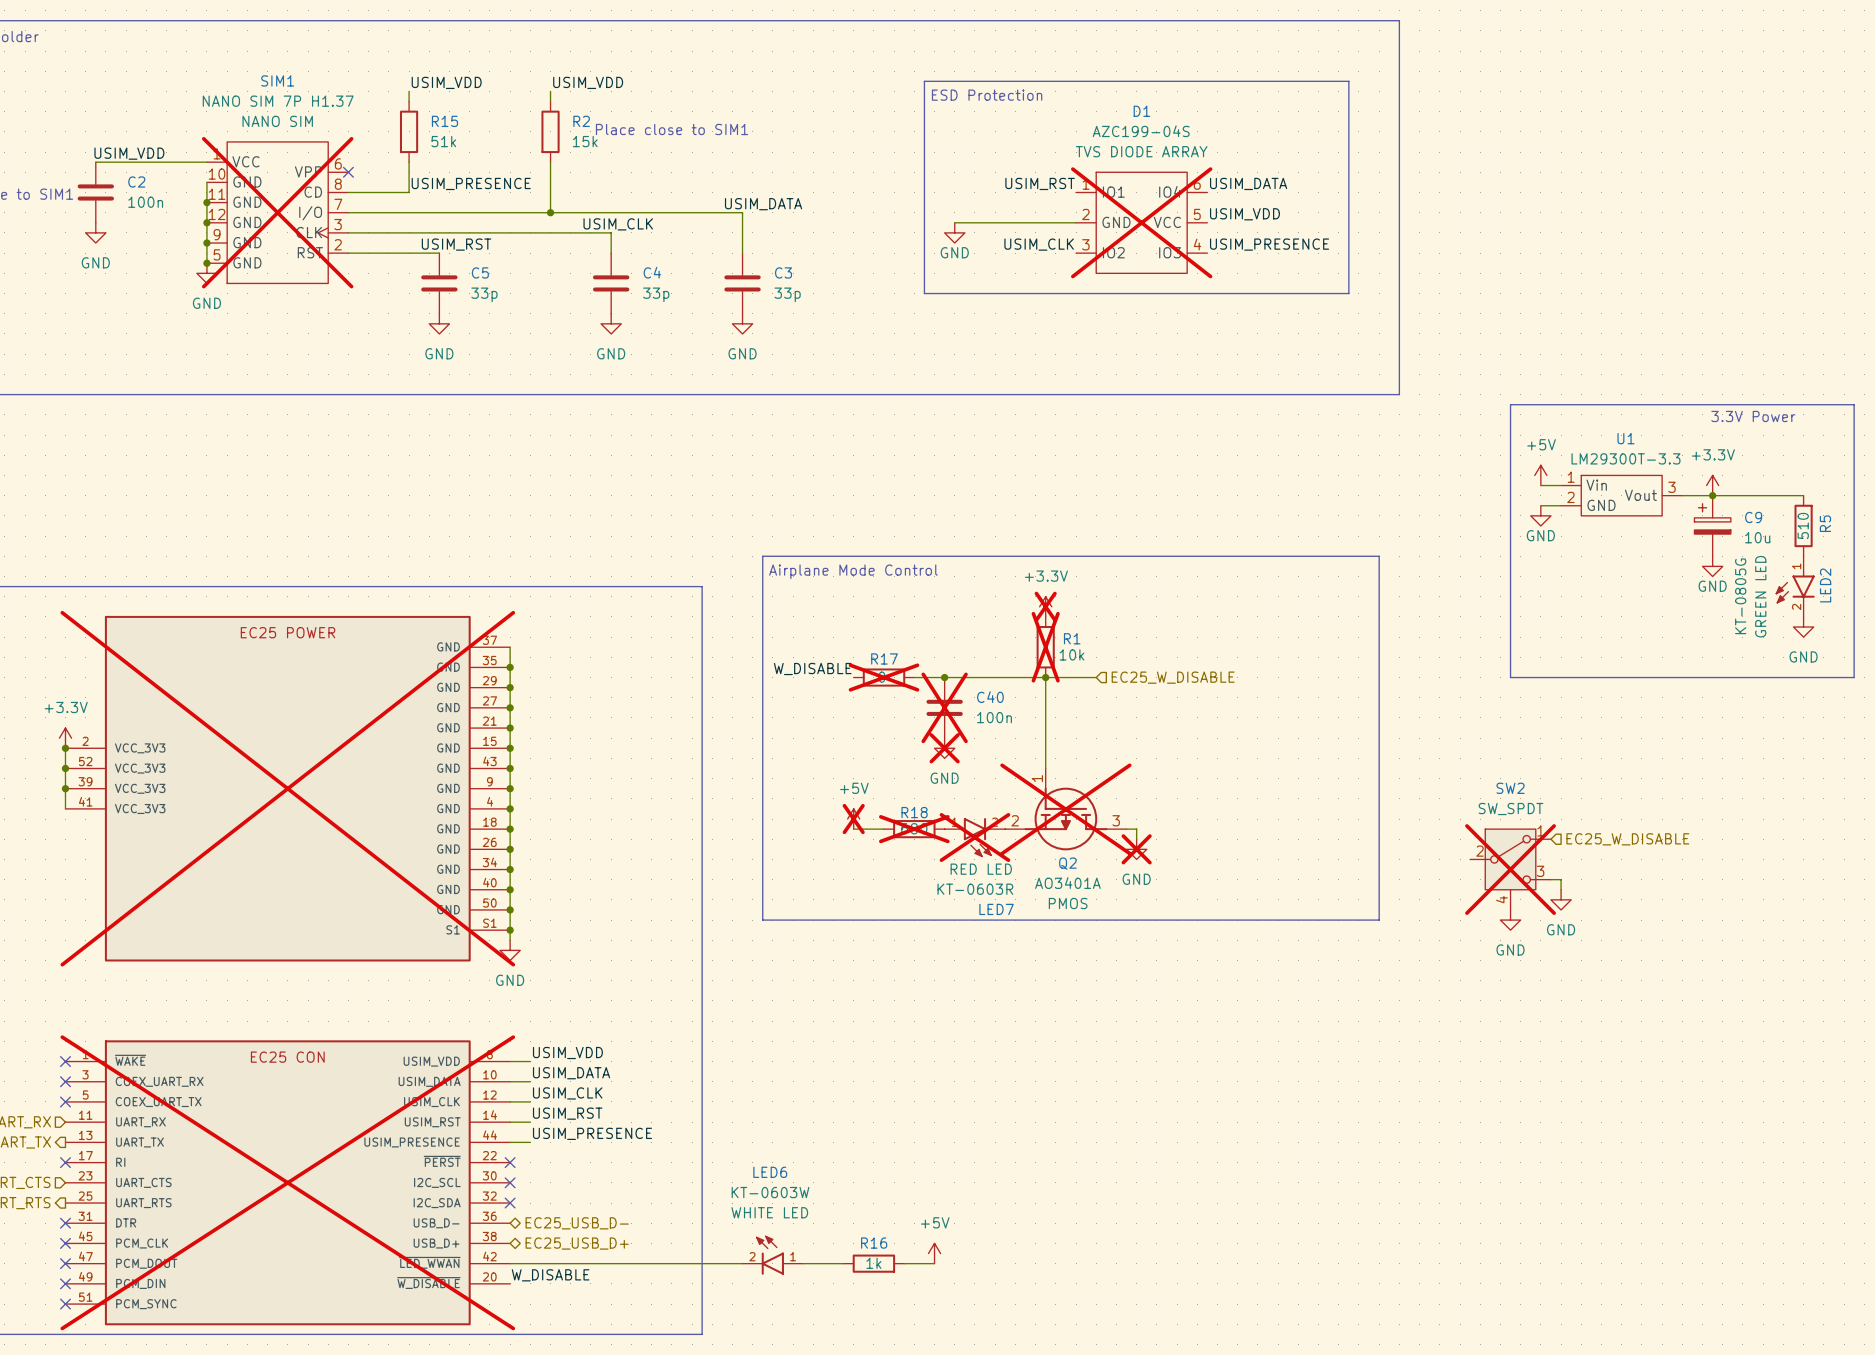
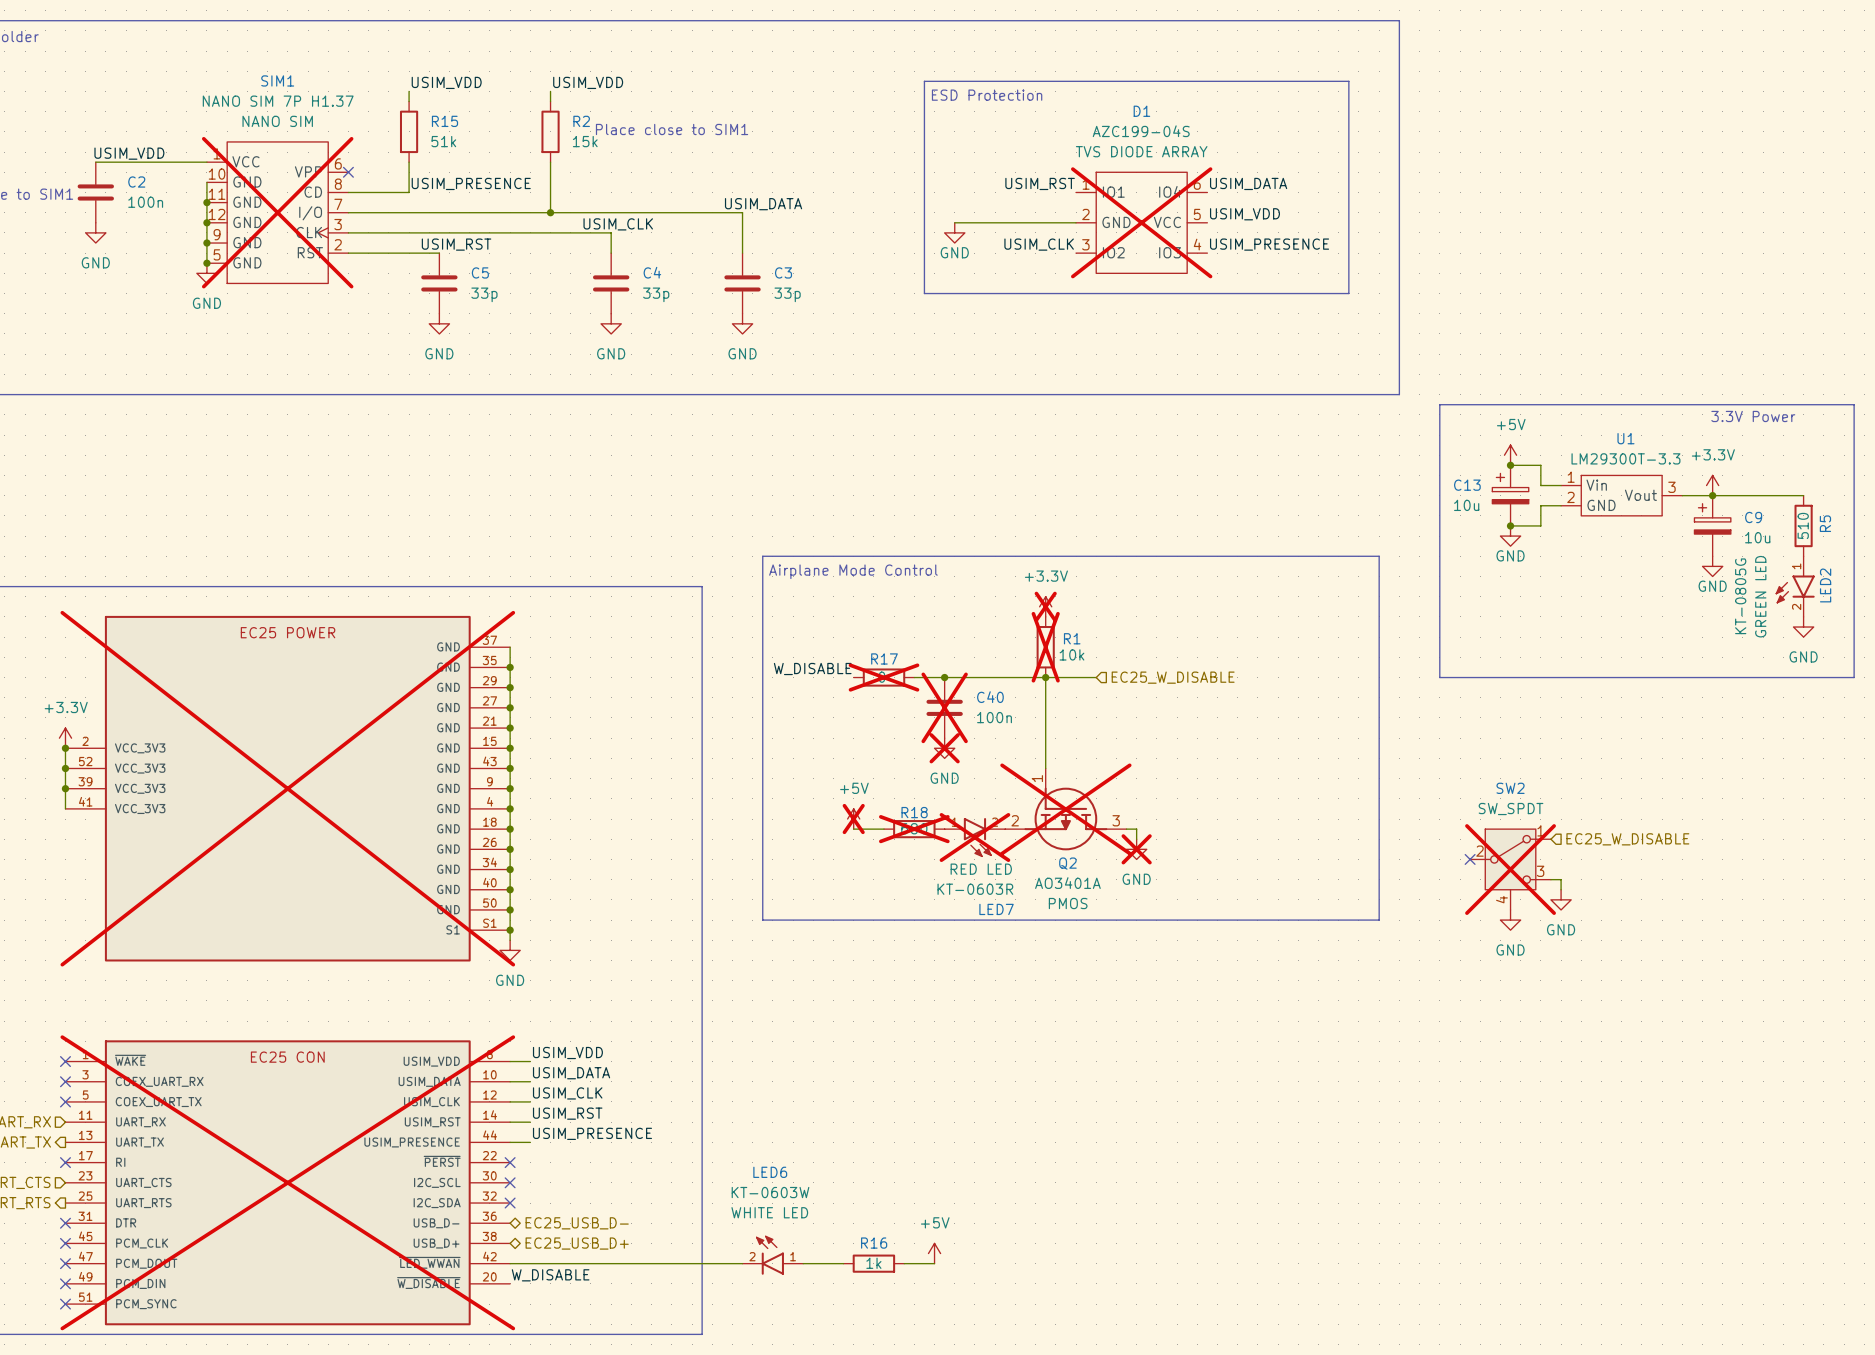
line: (1510, 404) (1510, 677) -> (1510, 404) (1439, 404) (1439, 677) (1510, 677)
wire: none -> (1510, 465) (1540, 465) (1540, 485)
junction: none -> (1510, 465)
power symbol position: +5V (1540, 475) -> +5V (1510, 455)
C13: none -> 10u (1510, 495)
wire: none -> (1540, 505) (1540, 525) (1510, 525)
power symbol position: GND (1540, 515) -> GND (1510, 536)
junction: none -> (1510, 525)
no-connect mark: none -> (1470, 859)

